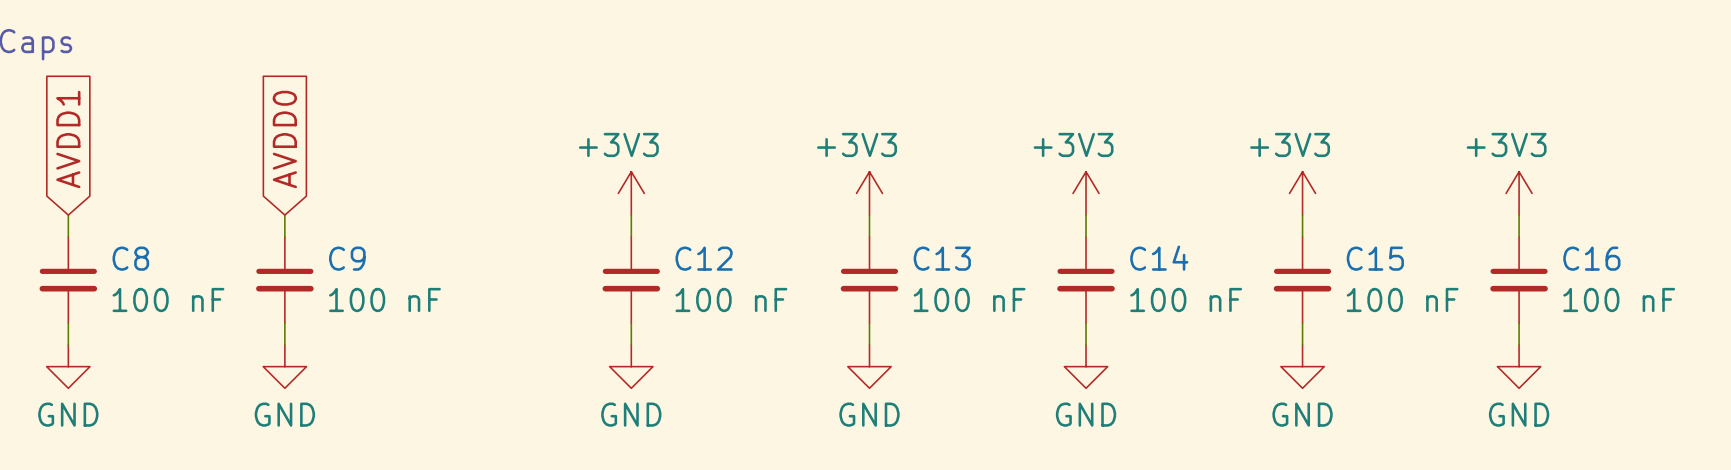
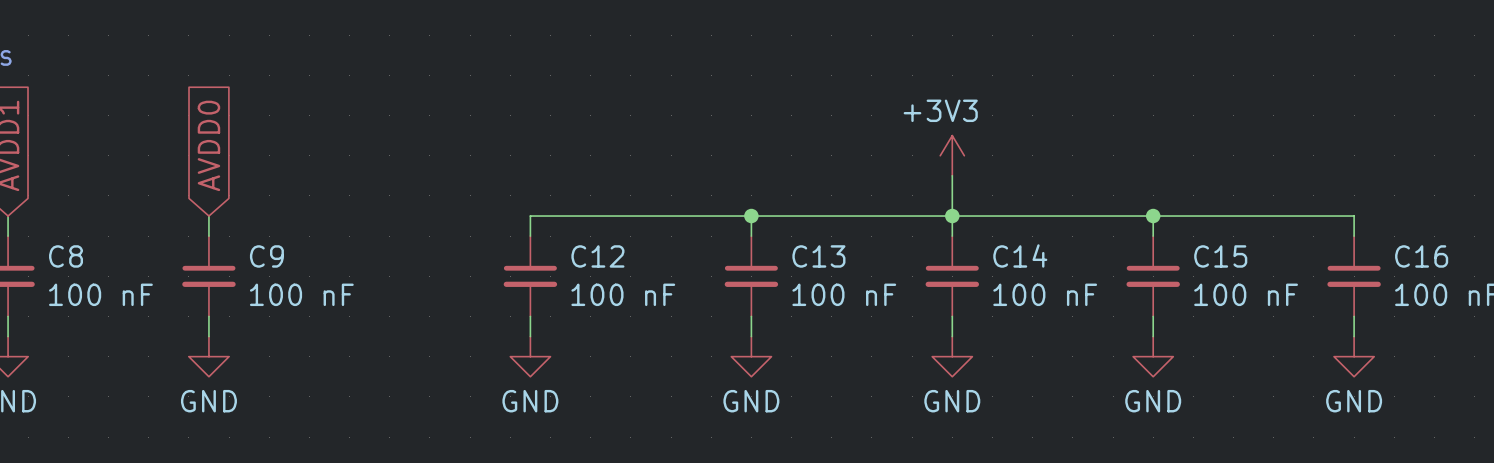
power symbol: +3V3 (631, 193) -> none
power symbol: +3V3 (869, 193) -> none
power symbol position: +3V3 (1086, 193) -> +3V3 (952, 155)
power symbol: +3V3 (1302, 193) -> none
power symbol: +3V3 (1519, 193) -> none
wire: none -> (530, 216) (1354, 216)
junction: none -> (751, 216)
junction: none -> (952, 216)
junction: none -> (1153, 216)

